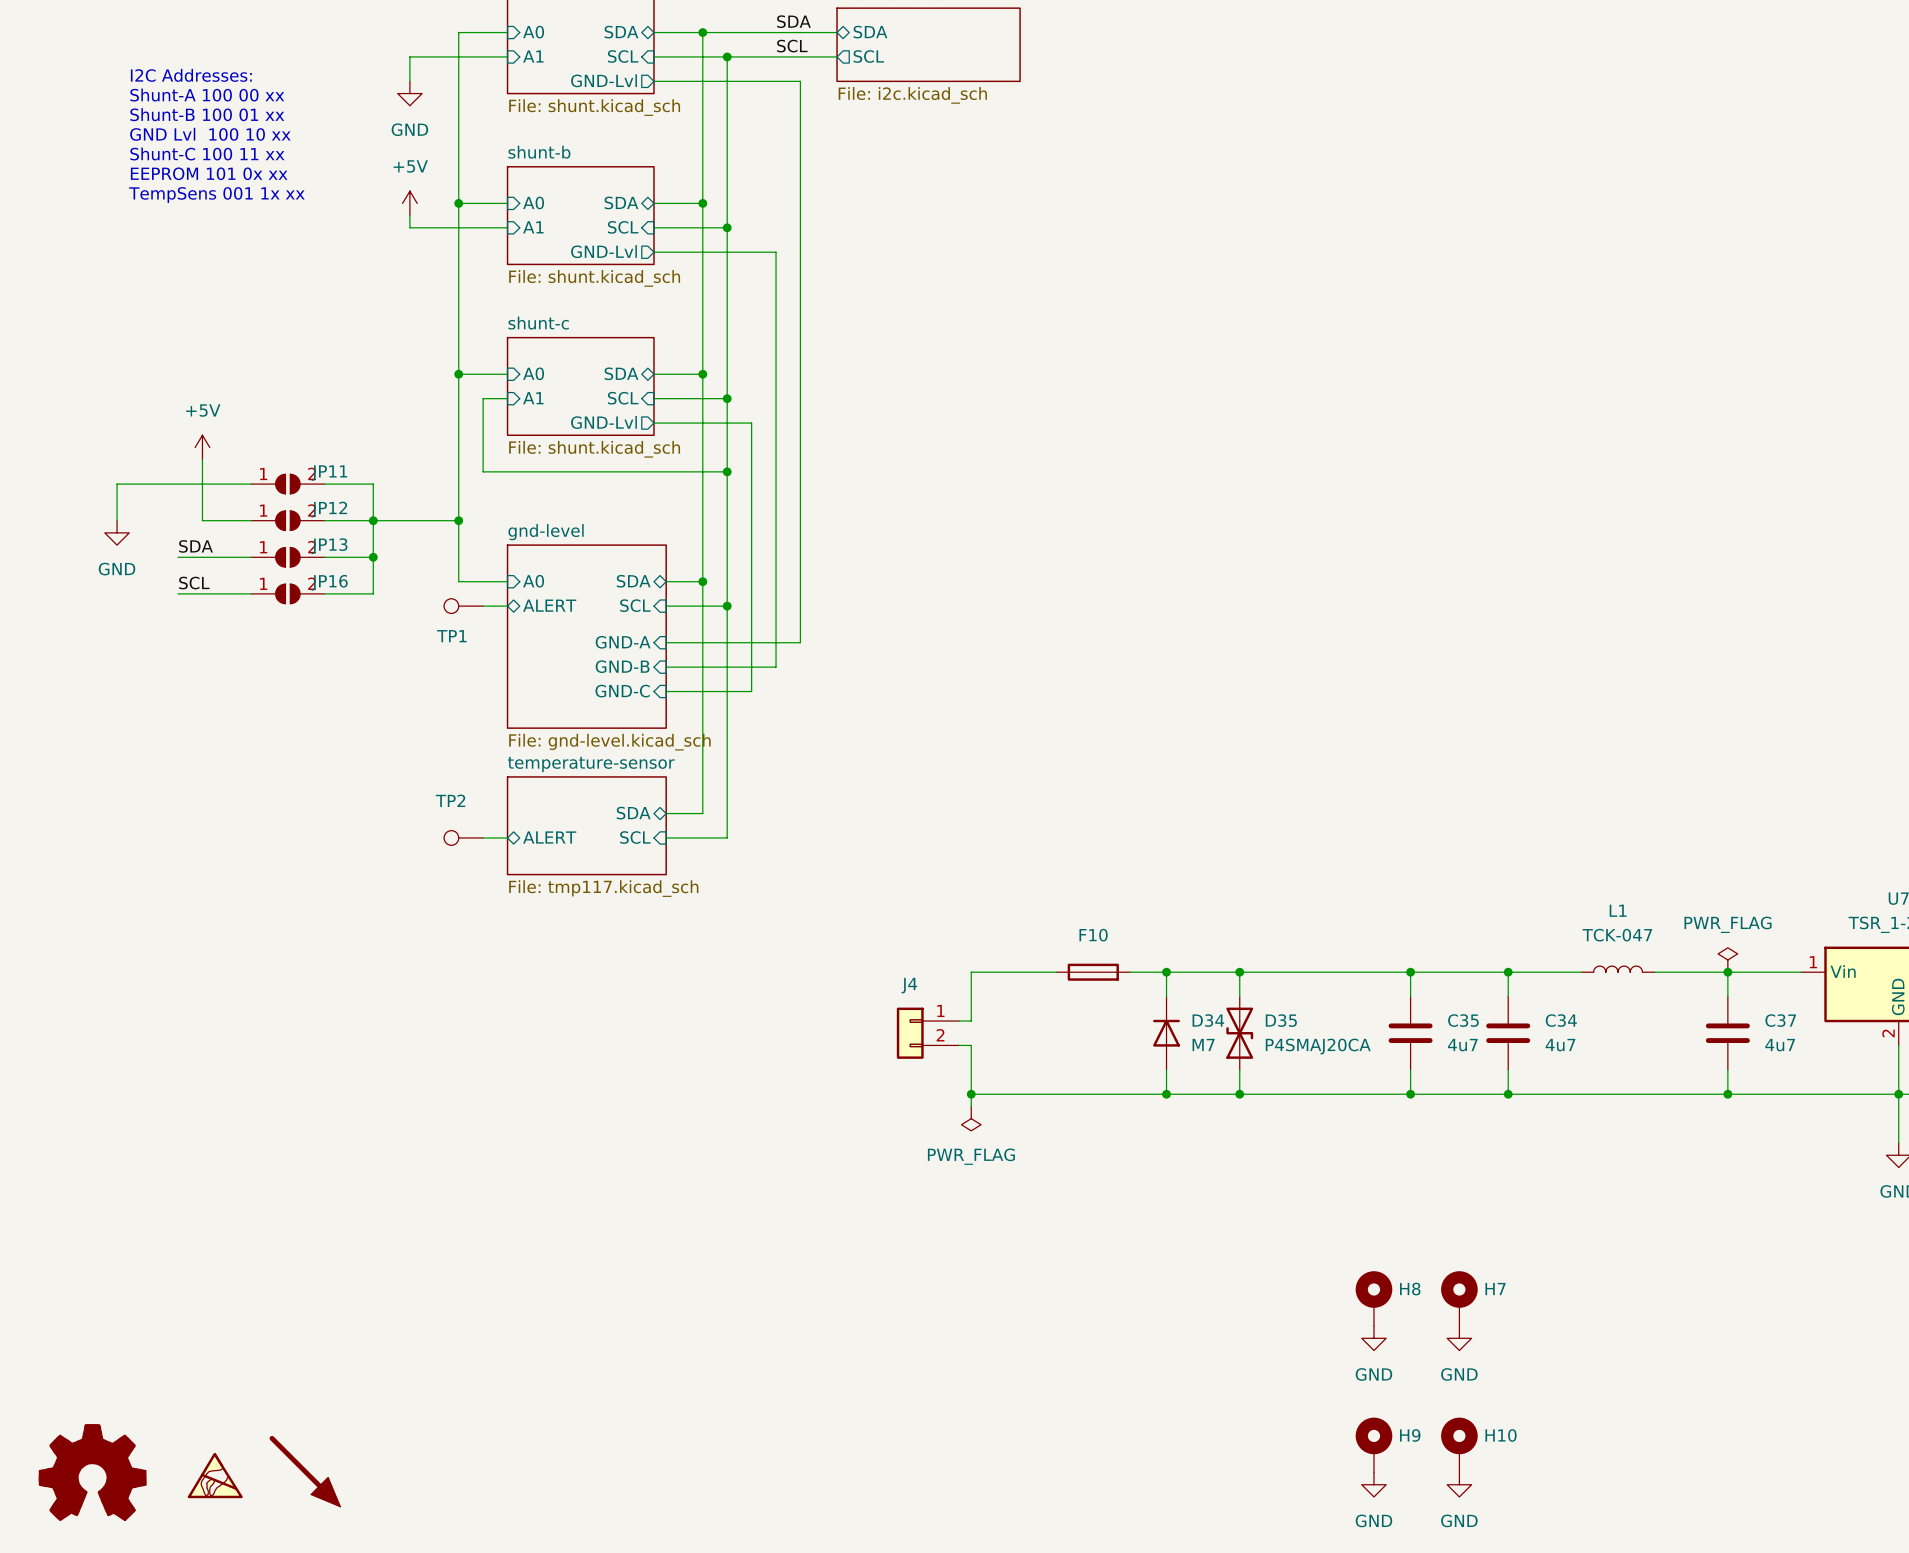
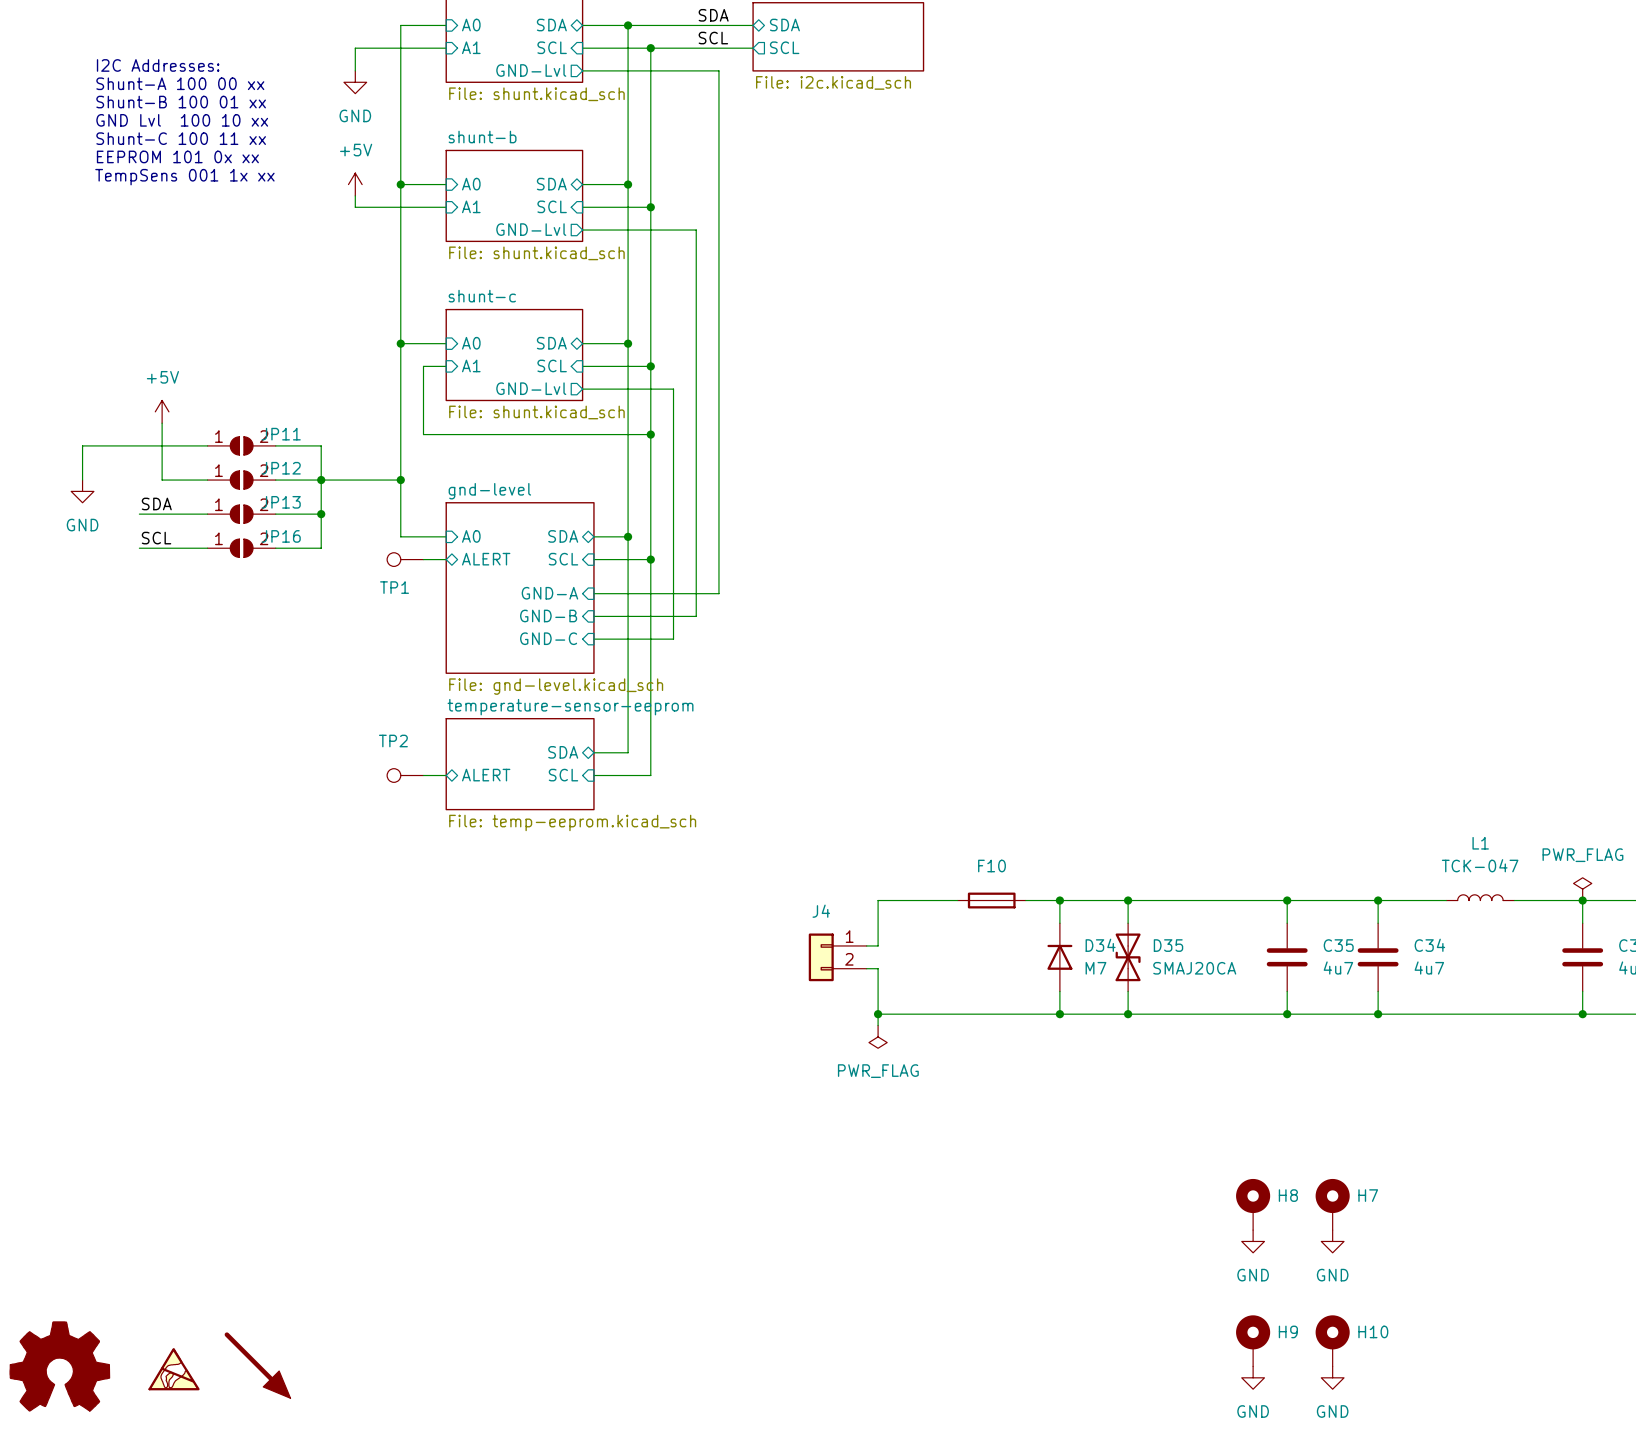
sheet temperature-sensor name: temperature-sensor (591, 764) -> temperature-sensor-eeprom (570, 707)
sheet temperature-sensor value: File: tmp117.kicad_sch (603, 888) -> File: temp-eeprom.kicad_sch (572, 822)
D35 value: P4SMAJ20CA (1318, 1046) -> SMAJ20CA (1194, 968)

